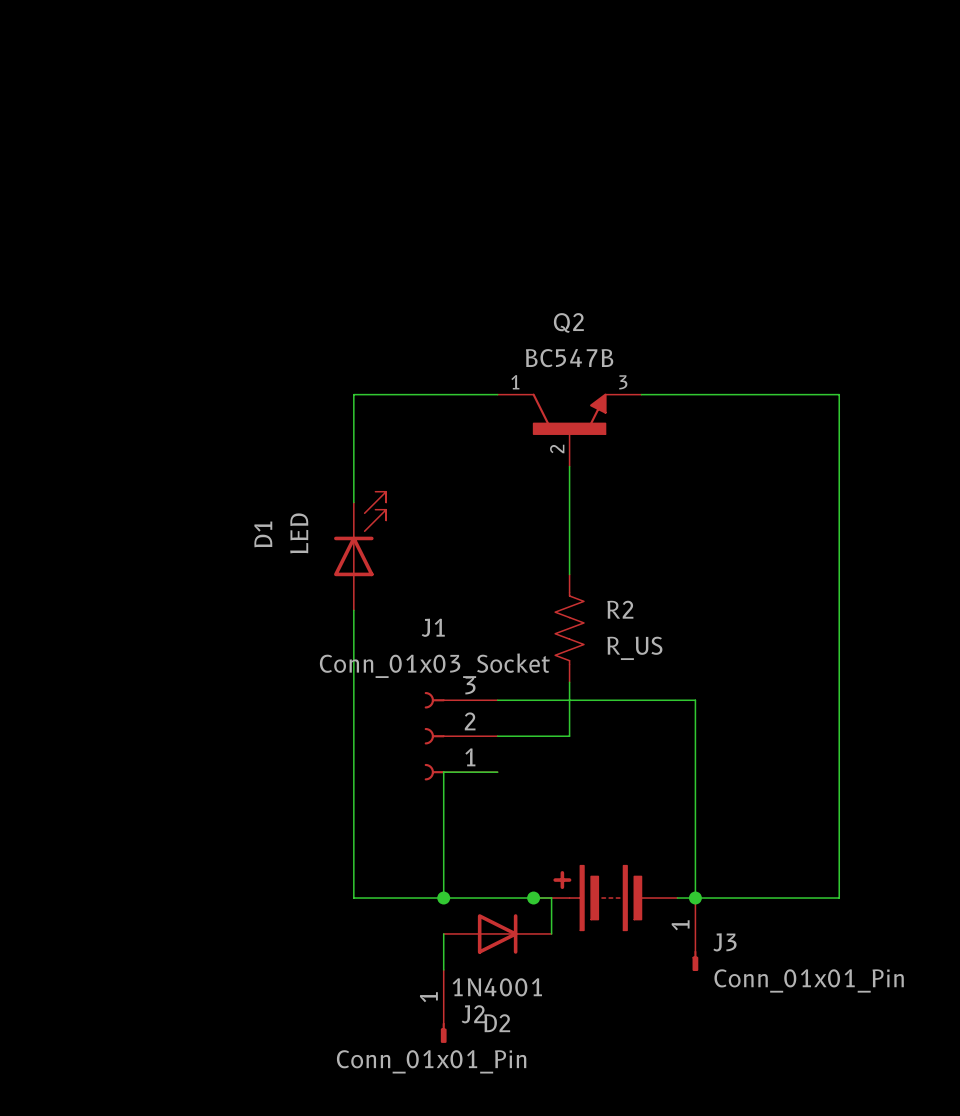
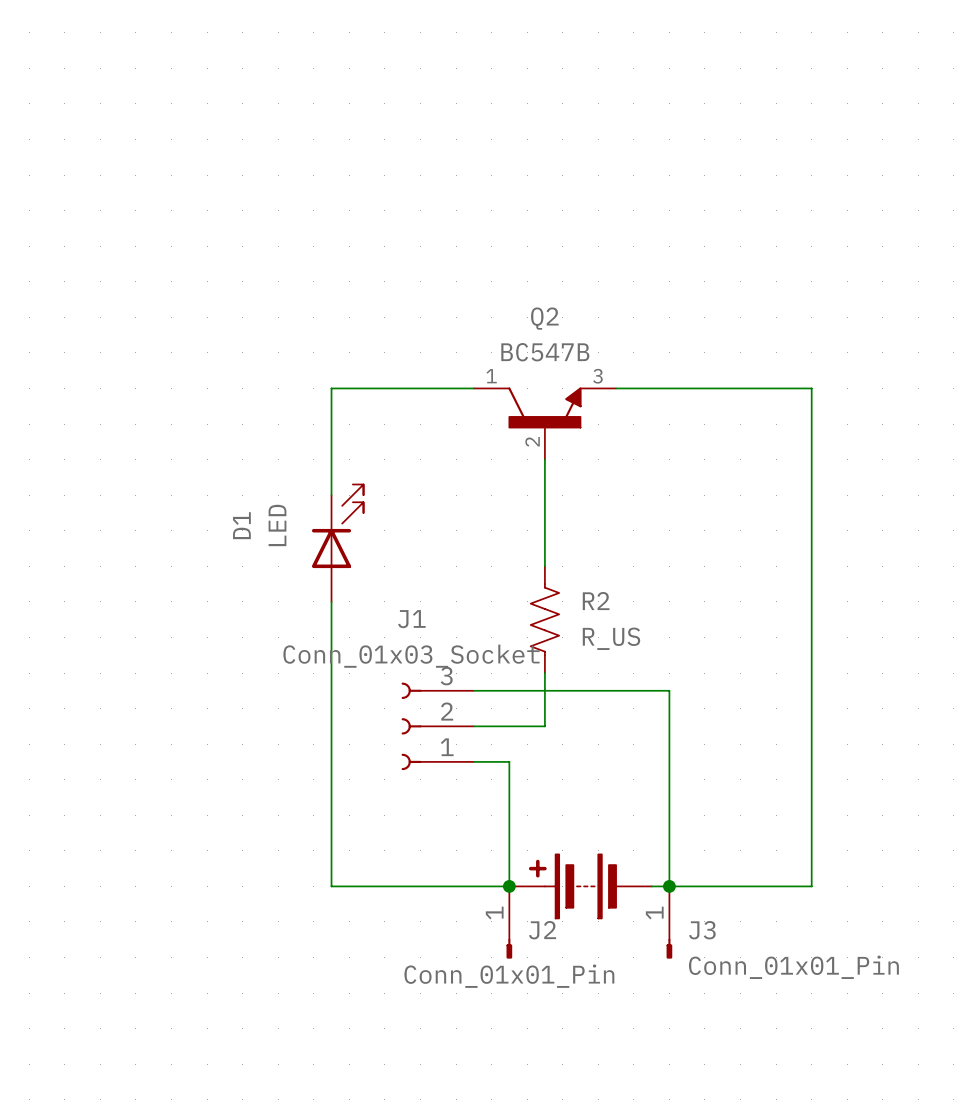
wire: (497, 772) (443, 772) (443, 898) -> (473, 761) (509, 761) (509, 886)
junction: (443, 898) -> none
wire: (533, 898) (551, 898) (551, 933) -> none
wire: (443, 933) (443, 969) -> none
D2: 1N4001 (497, 933) -> none
J2 position: (443, 1006) -> (509, 922)

